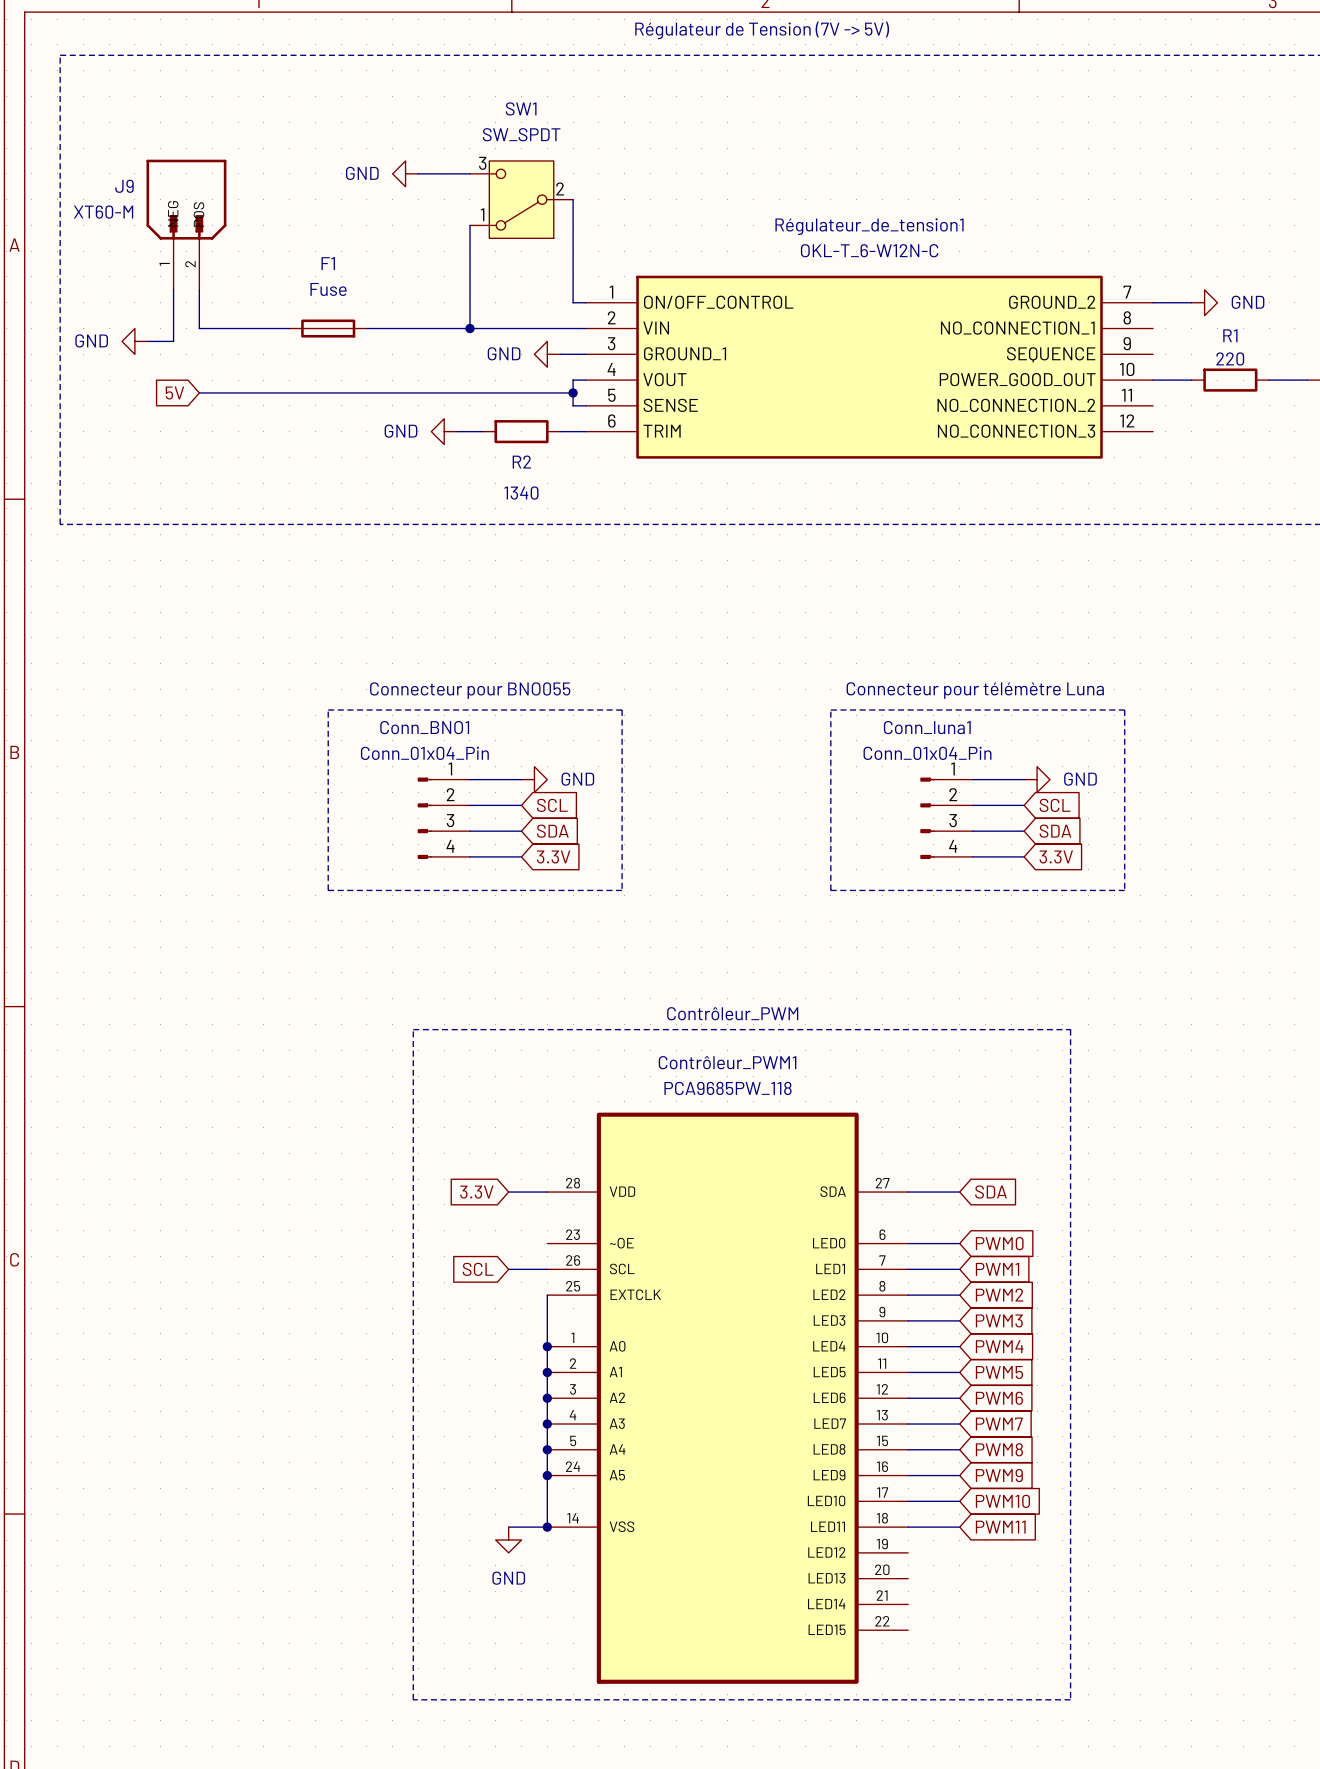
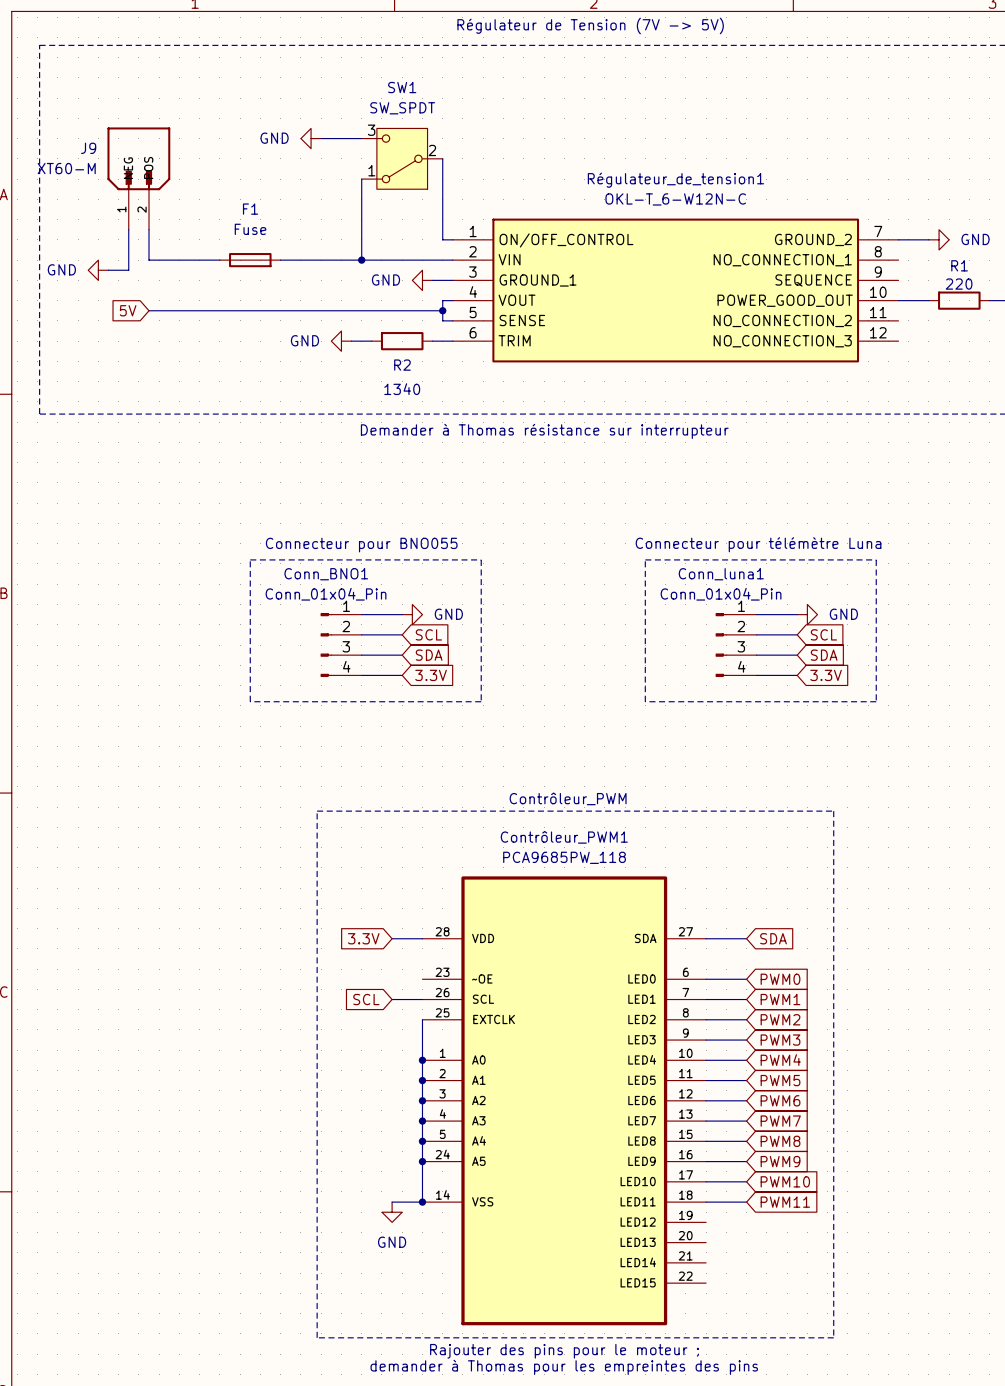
text: none -> Demander à Thomas résistance sur interrupteur (544, 431)
text: none -> Rajouter des pins pour le moteur ; (564, 1351)
text: none -> demander à Thomas pour les empreintes des pins (564, 1367)

